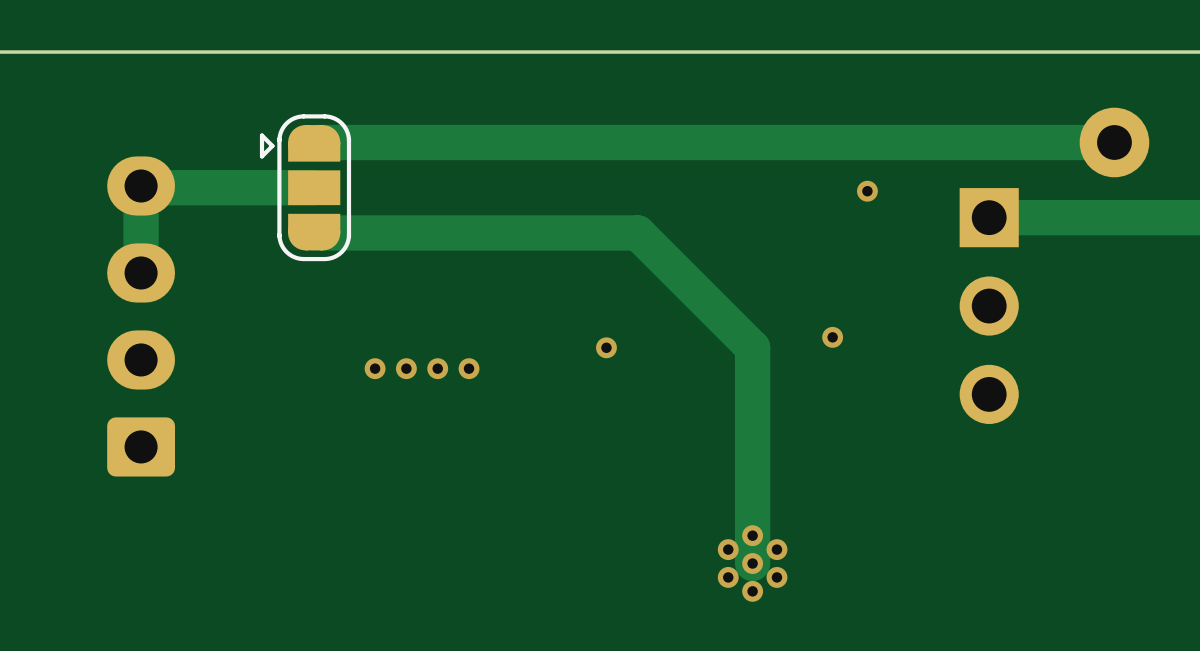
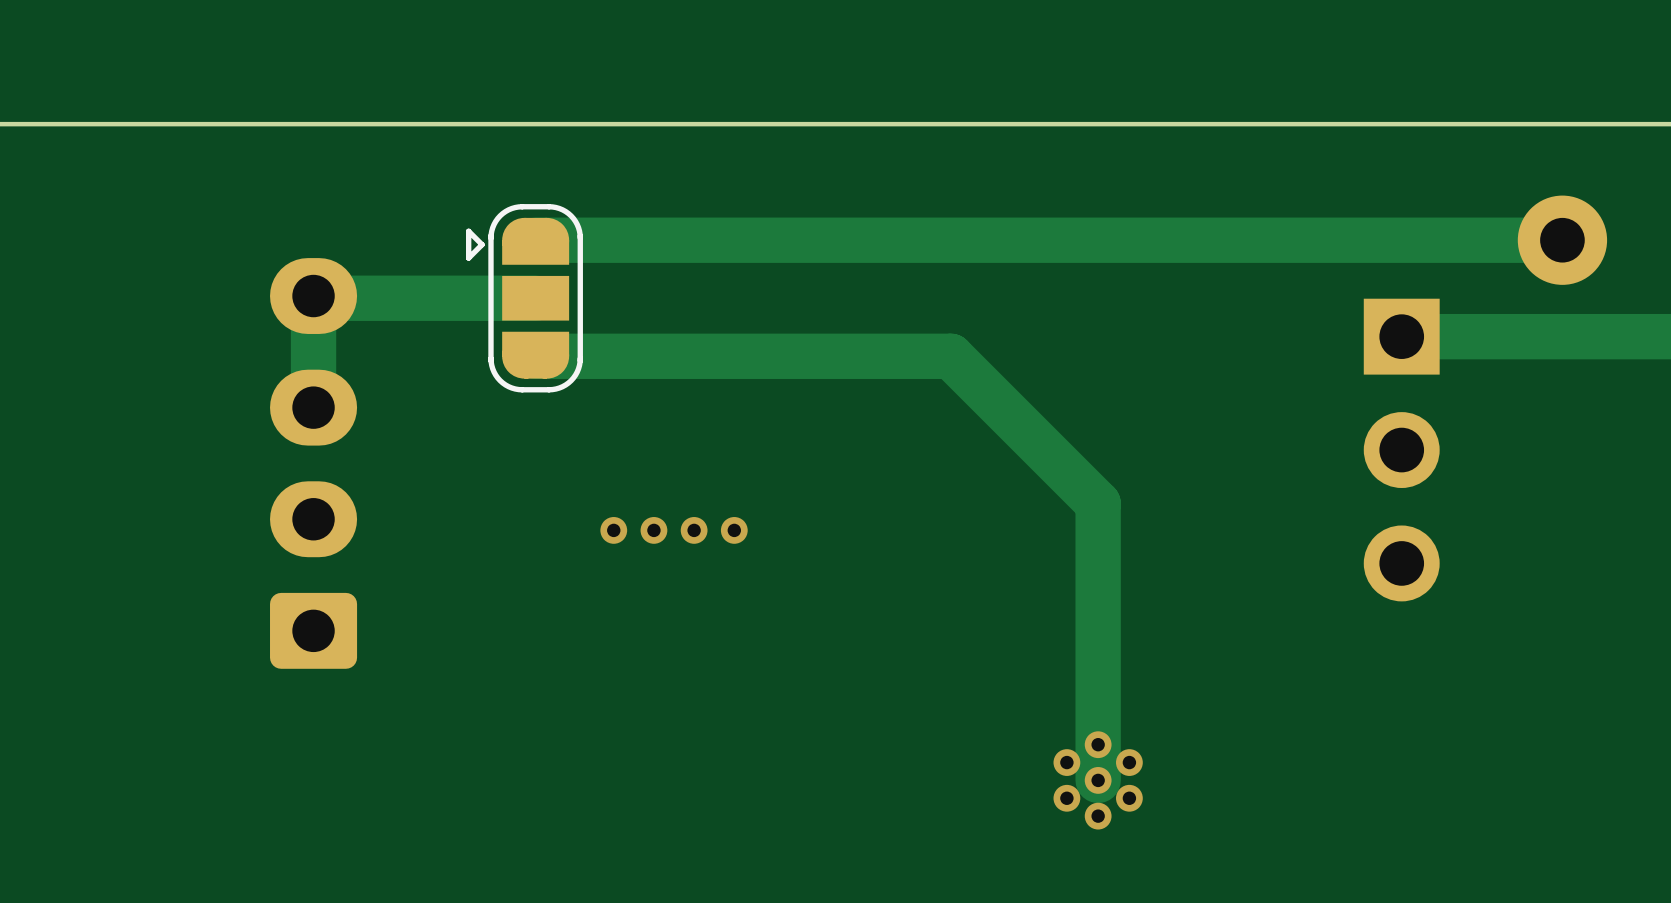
via: (867, 191) -> none
via: (832, 337) -> none
via: (606, 347) -> none

